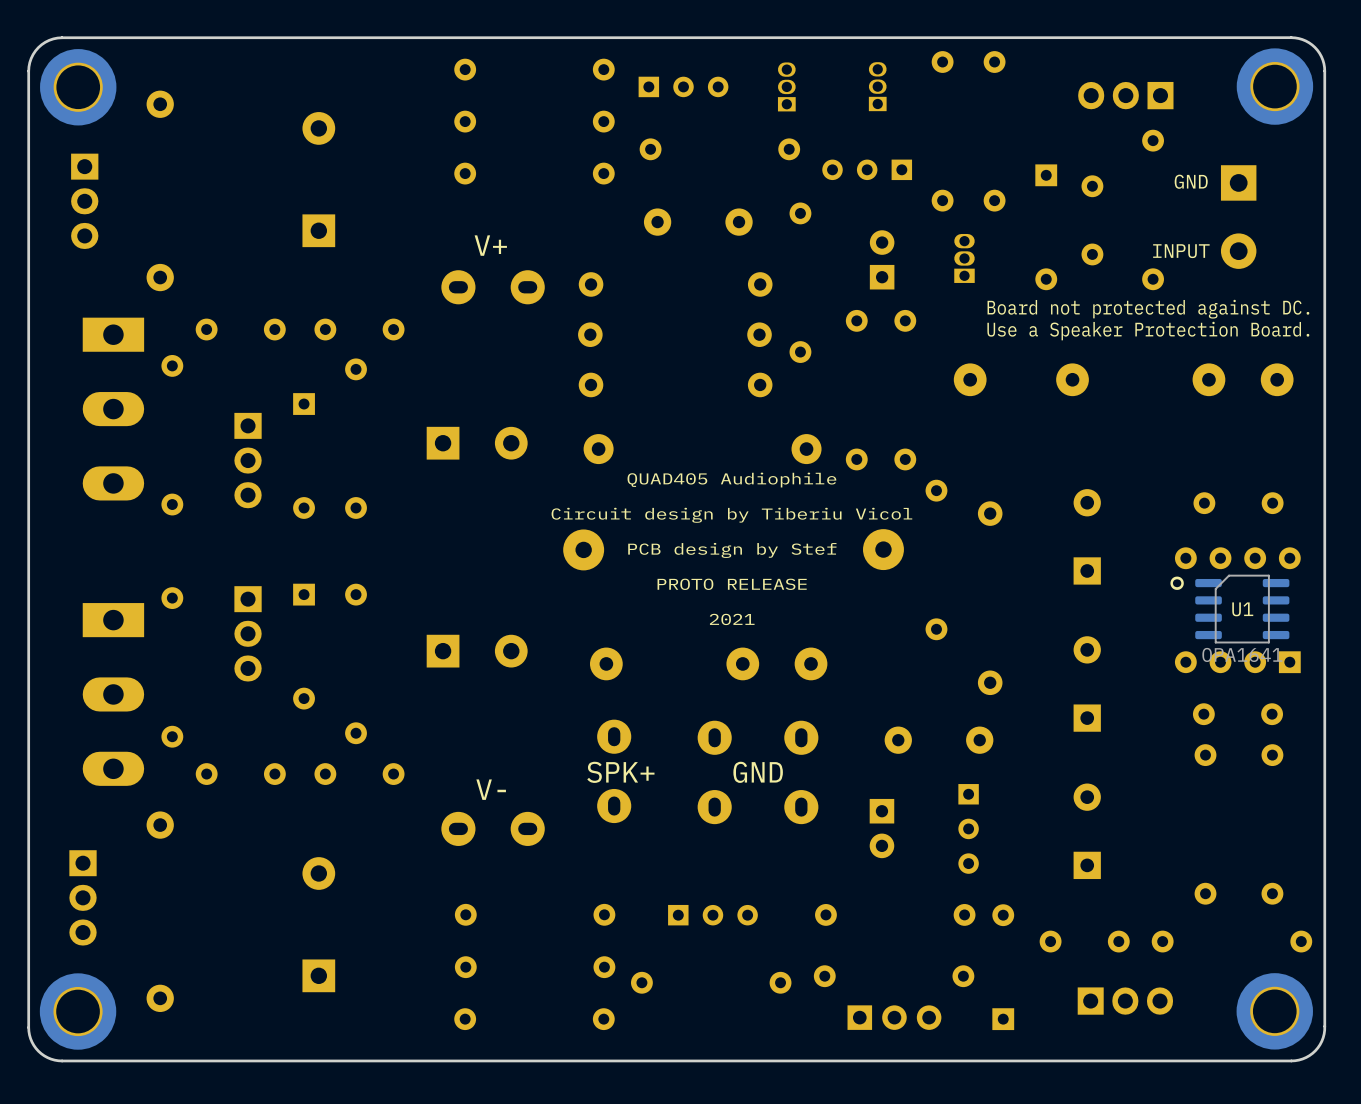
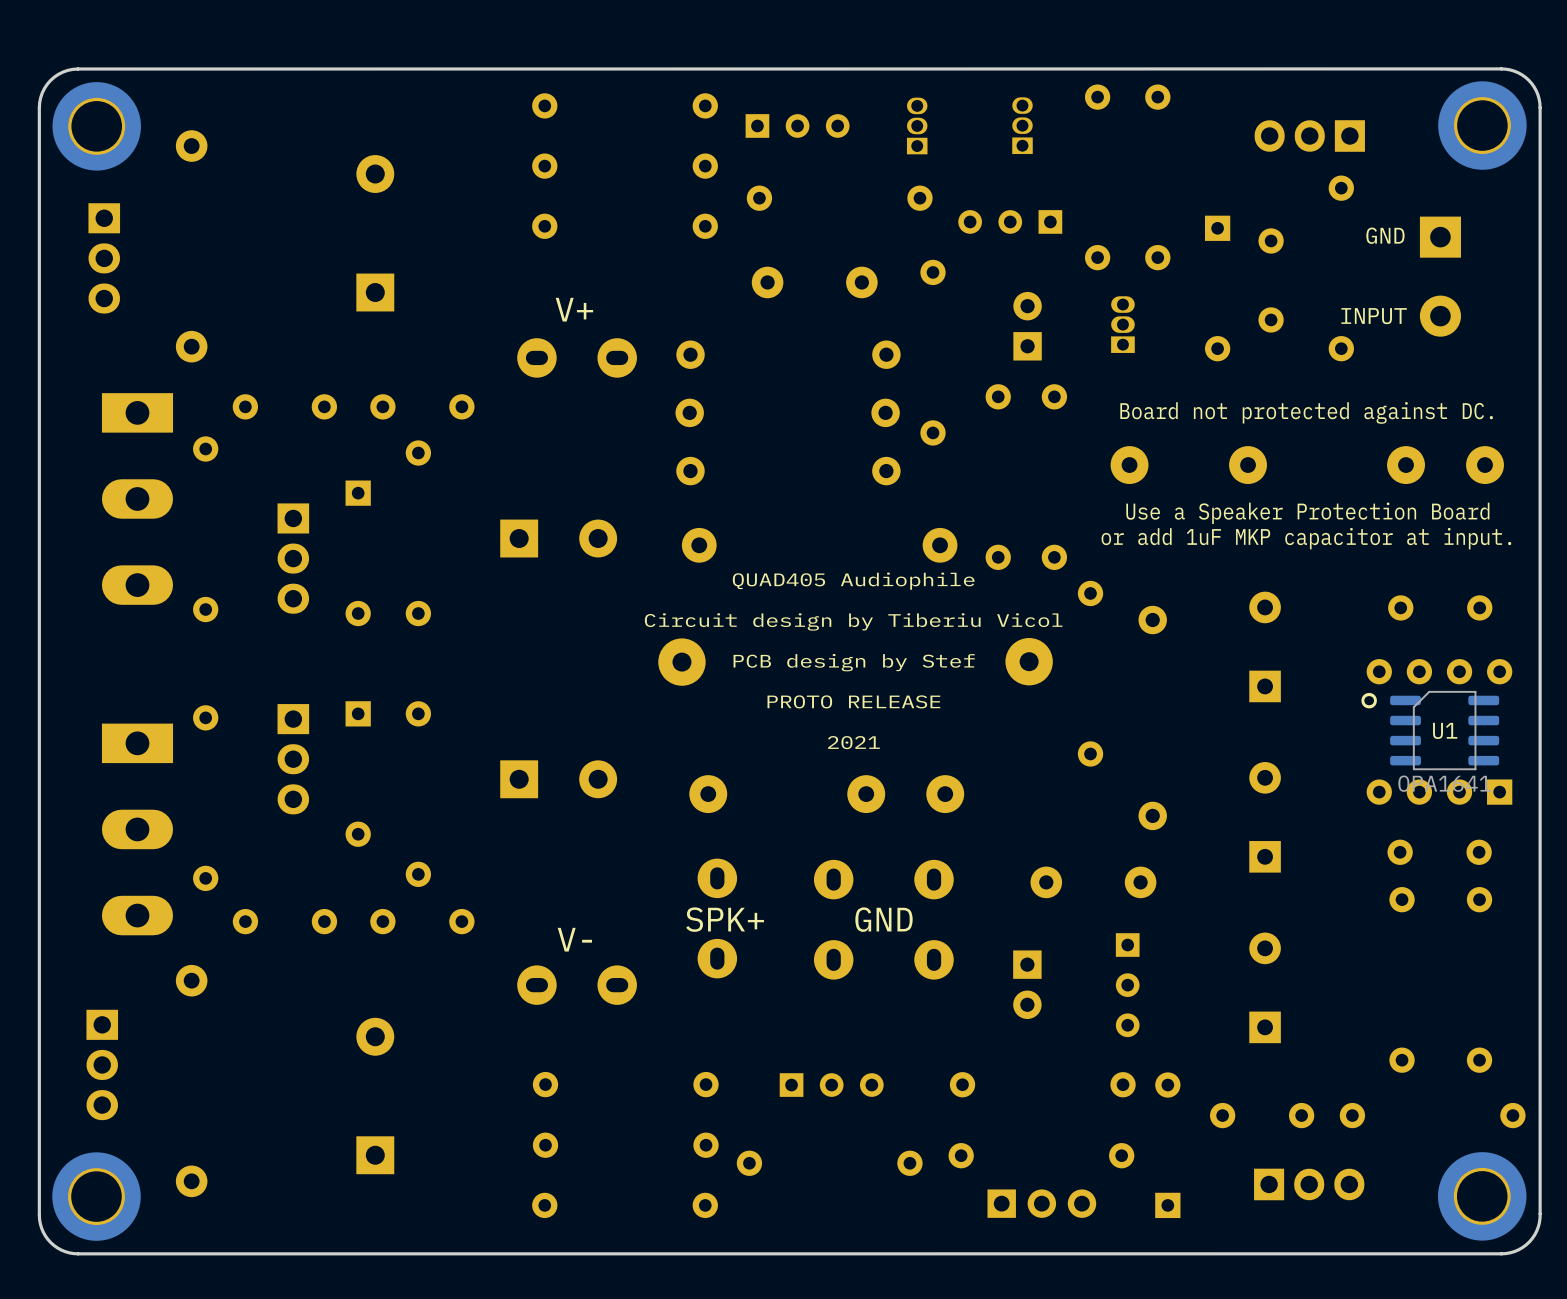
text position: Board not protected against DC. (1148, 309) -> Board not protected against DC. (1306, 412)
text: Use a Speaker Protection Board. (1148, 331) -> none
text: none -> Use a Speaker Protection Board (1307, 513)
text: none -> or add 1uF MKP capacitor at input. (1306, 538)

